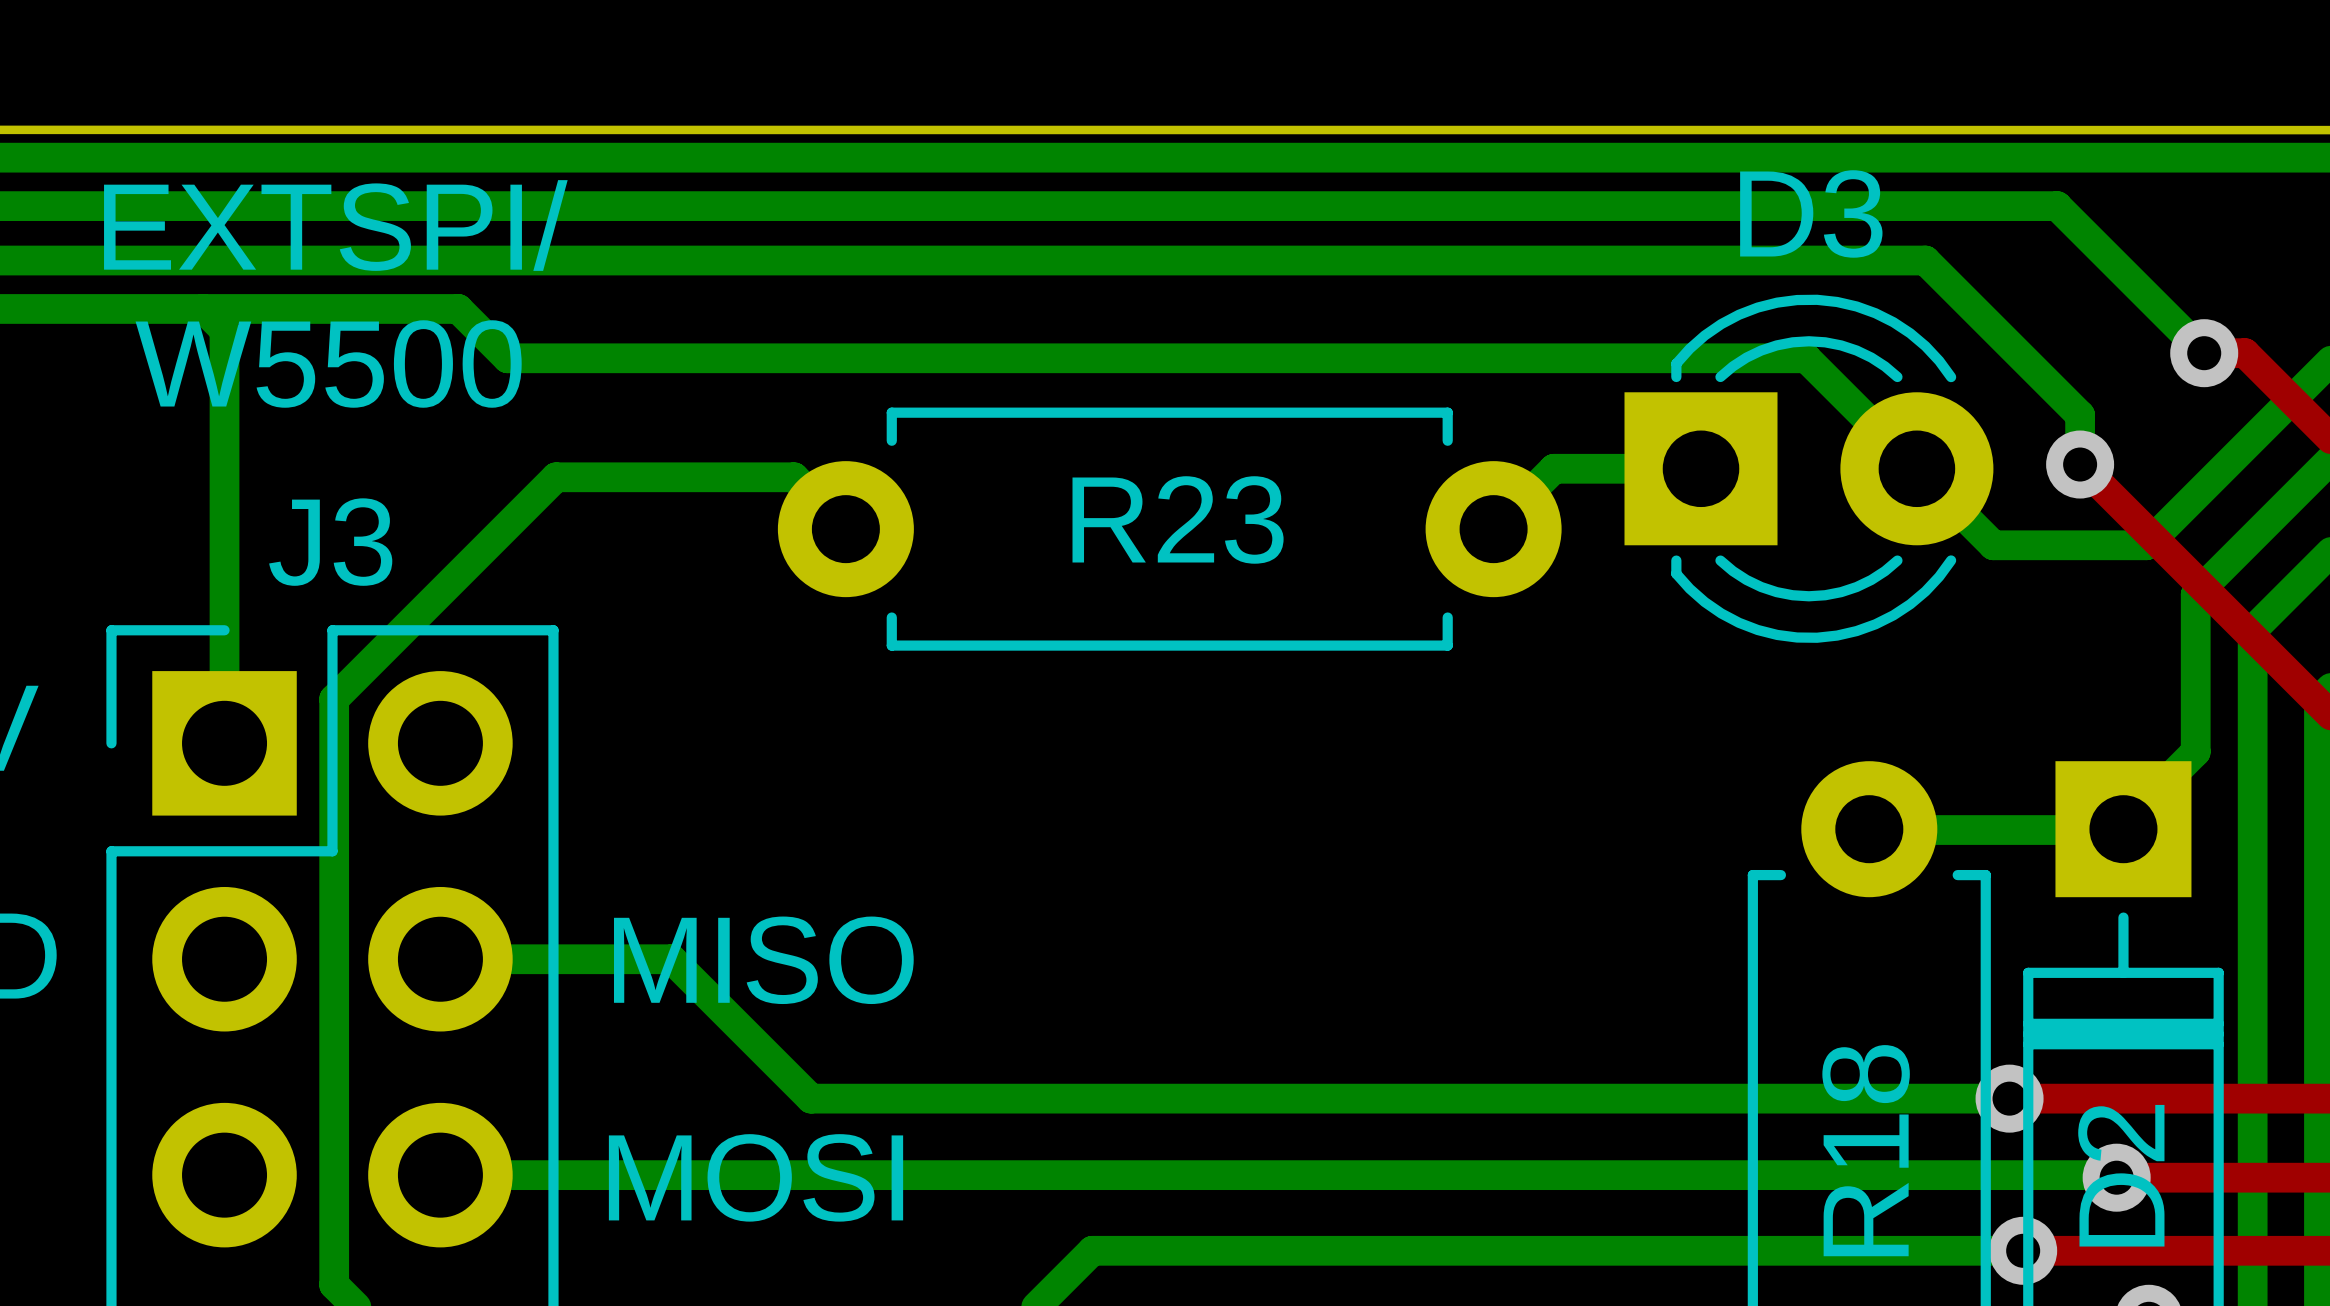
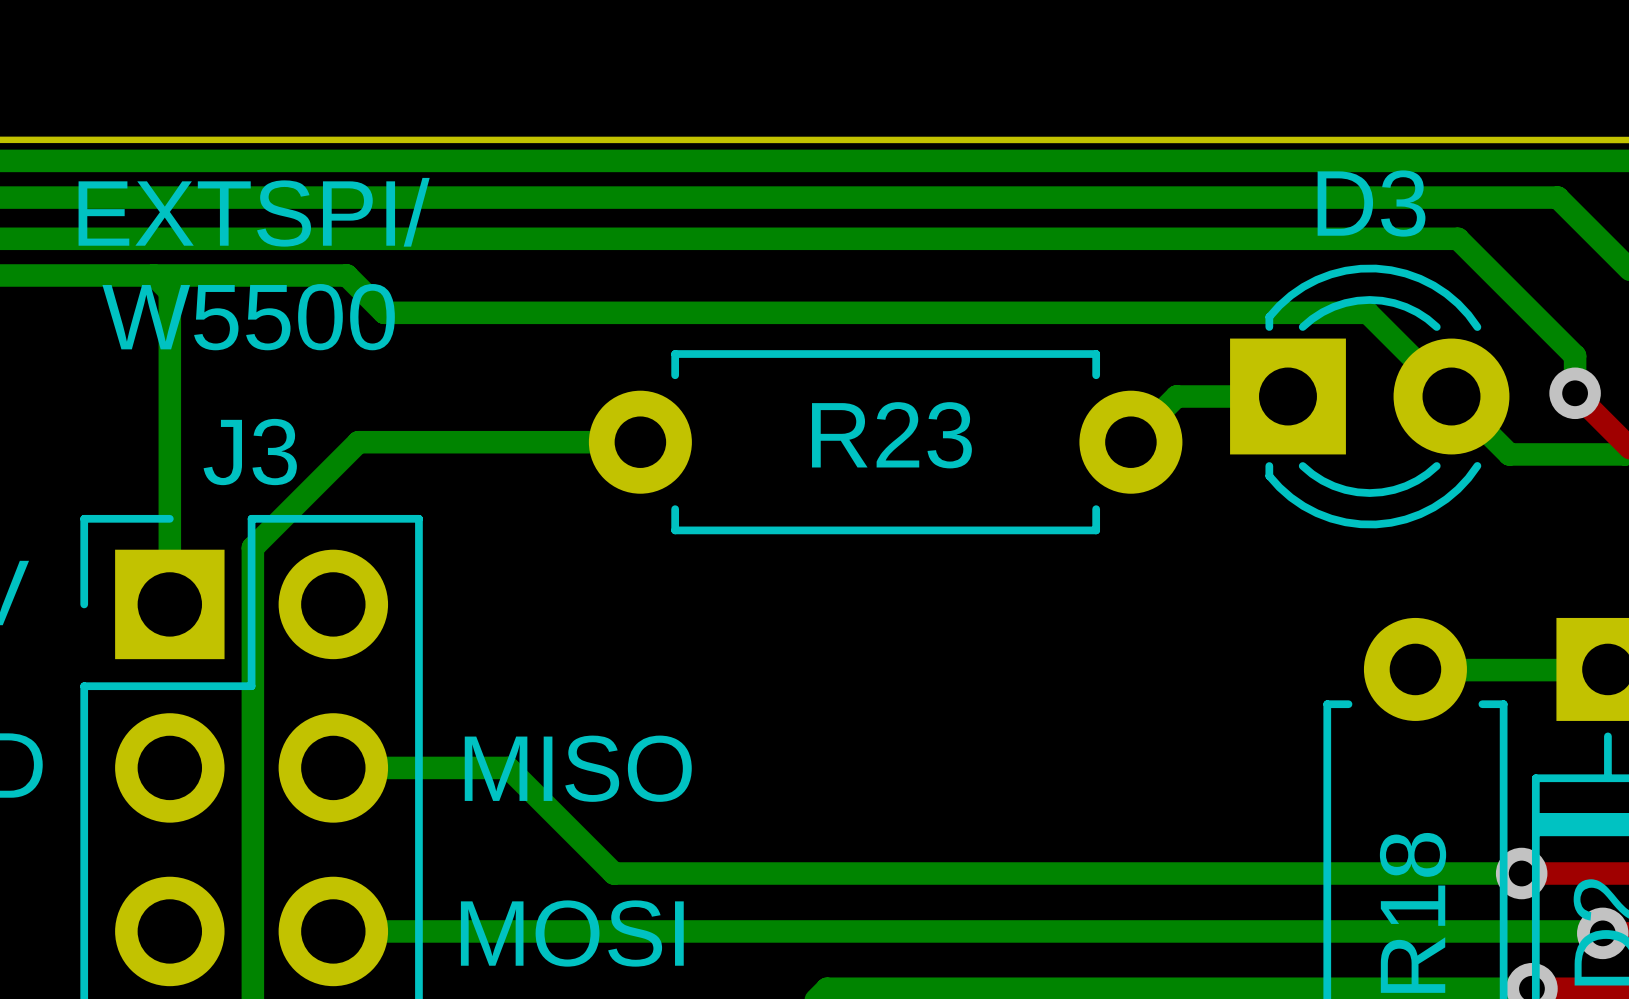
bottom track: (845, 529) (794, 477) (556, 477) (334, 699) -> (640, 442) (358, 442) (252, 547) (252, 570)

